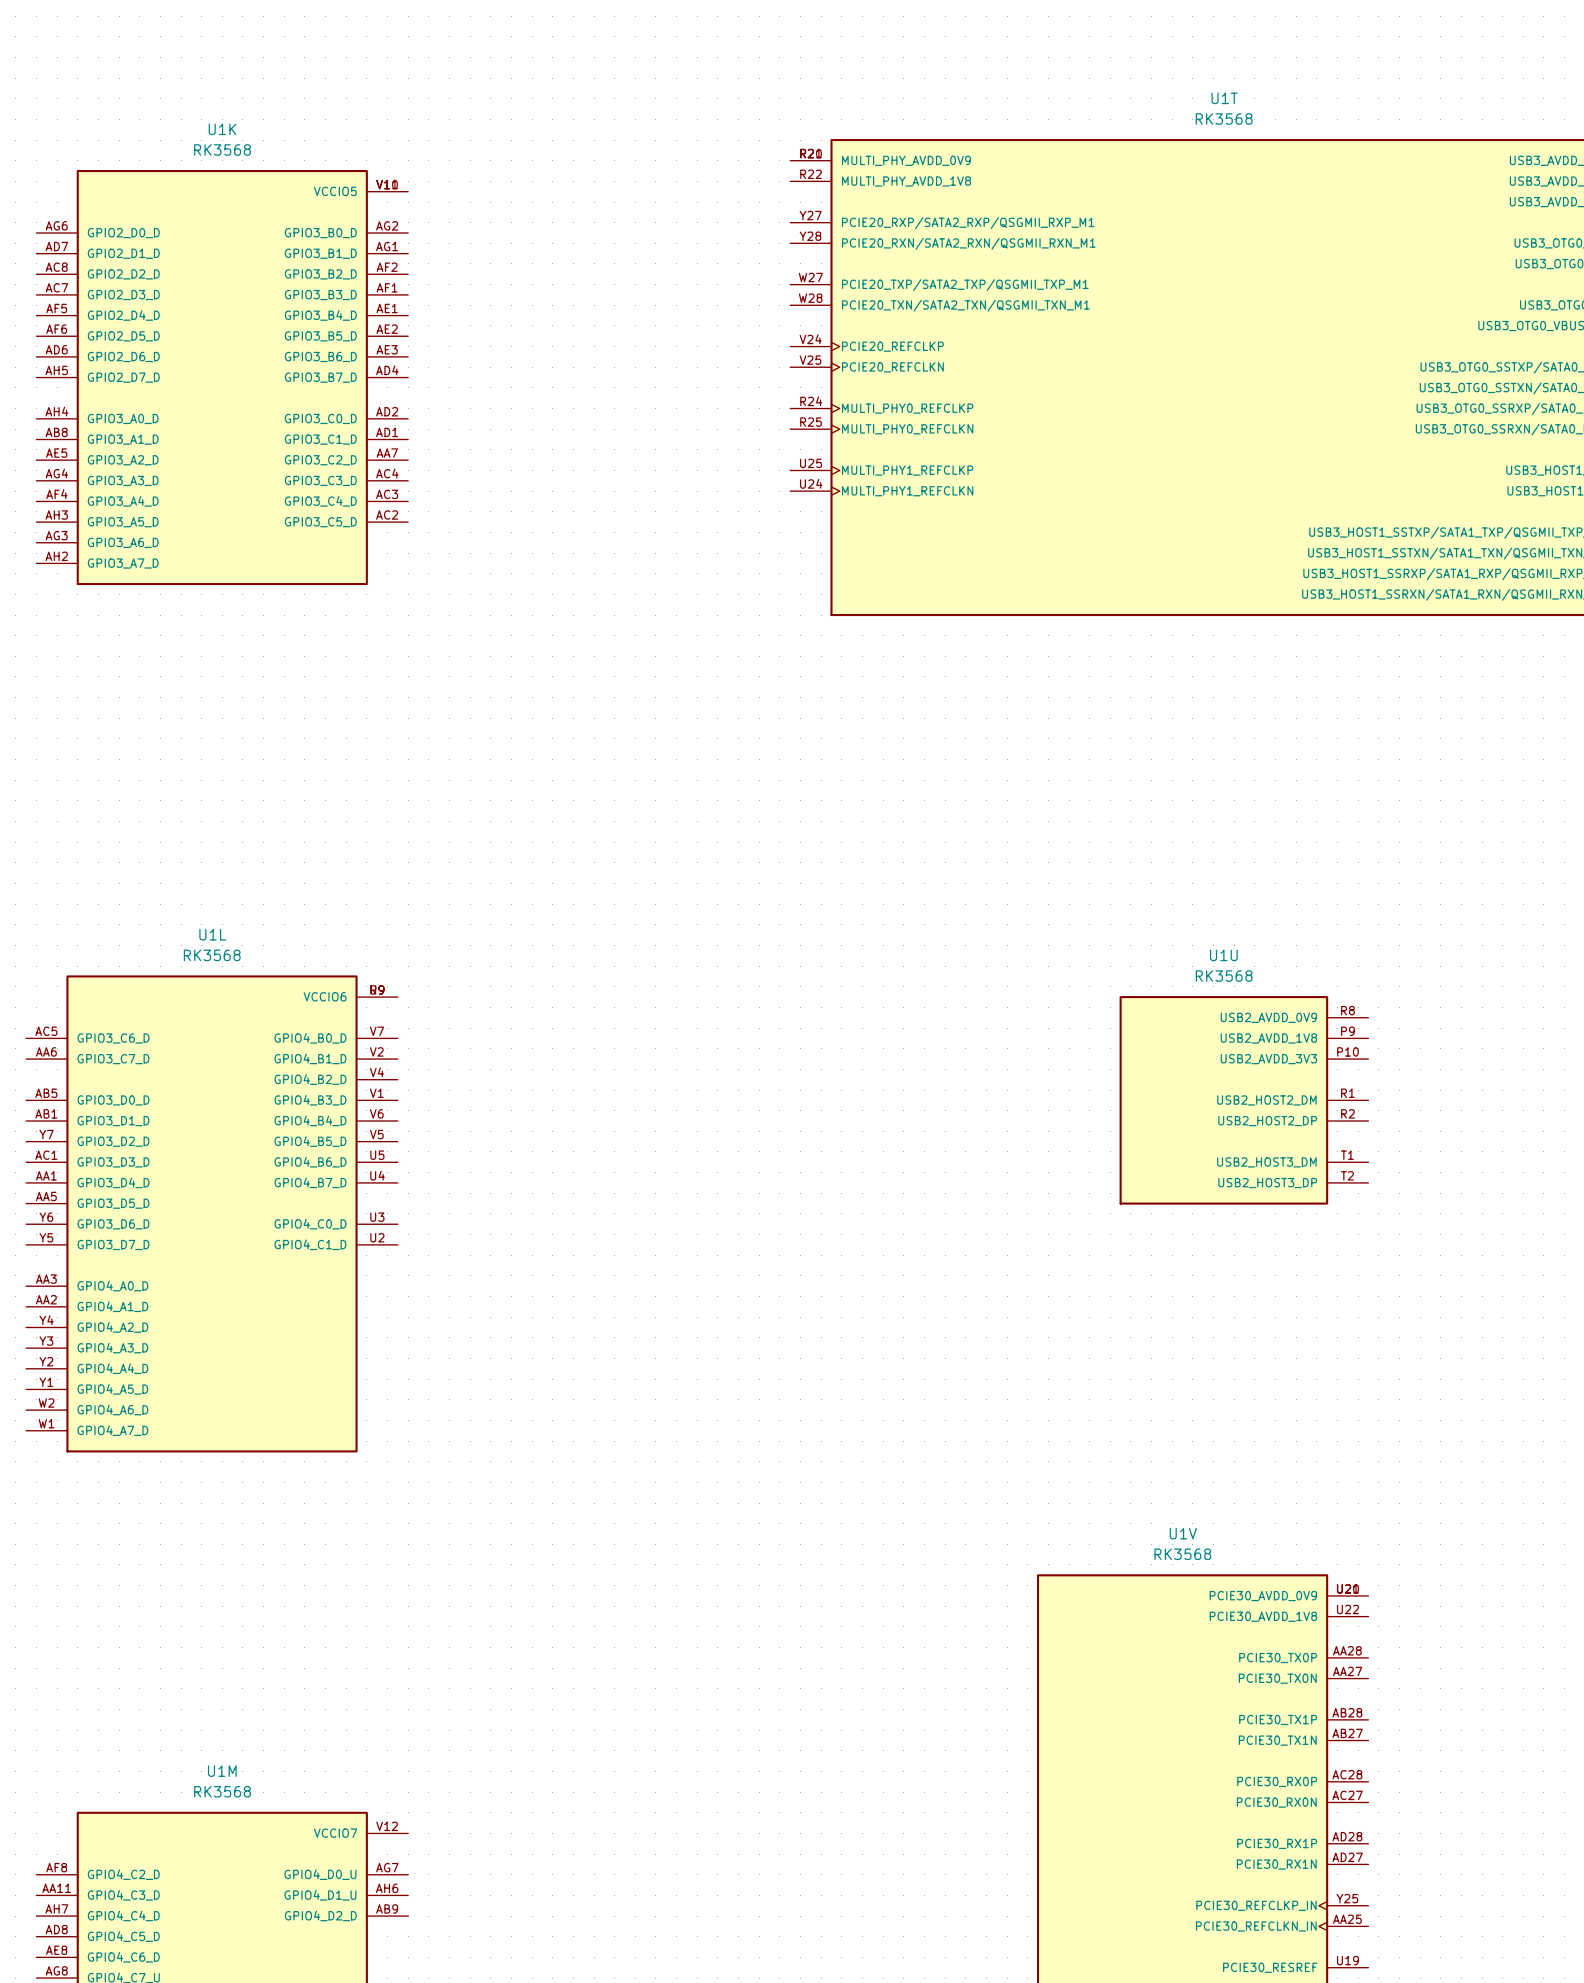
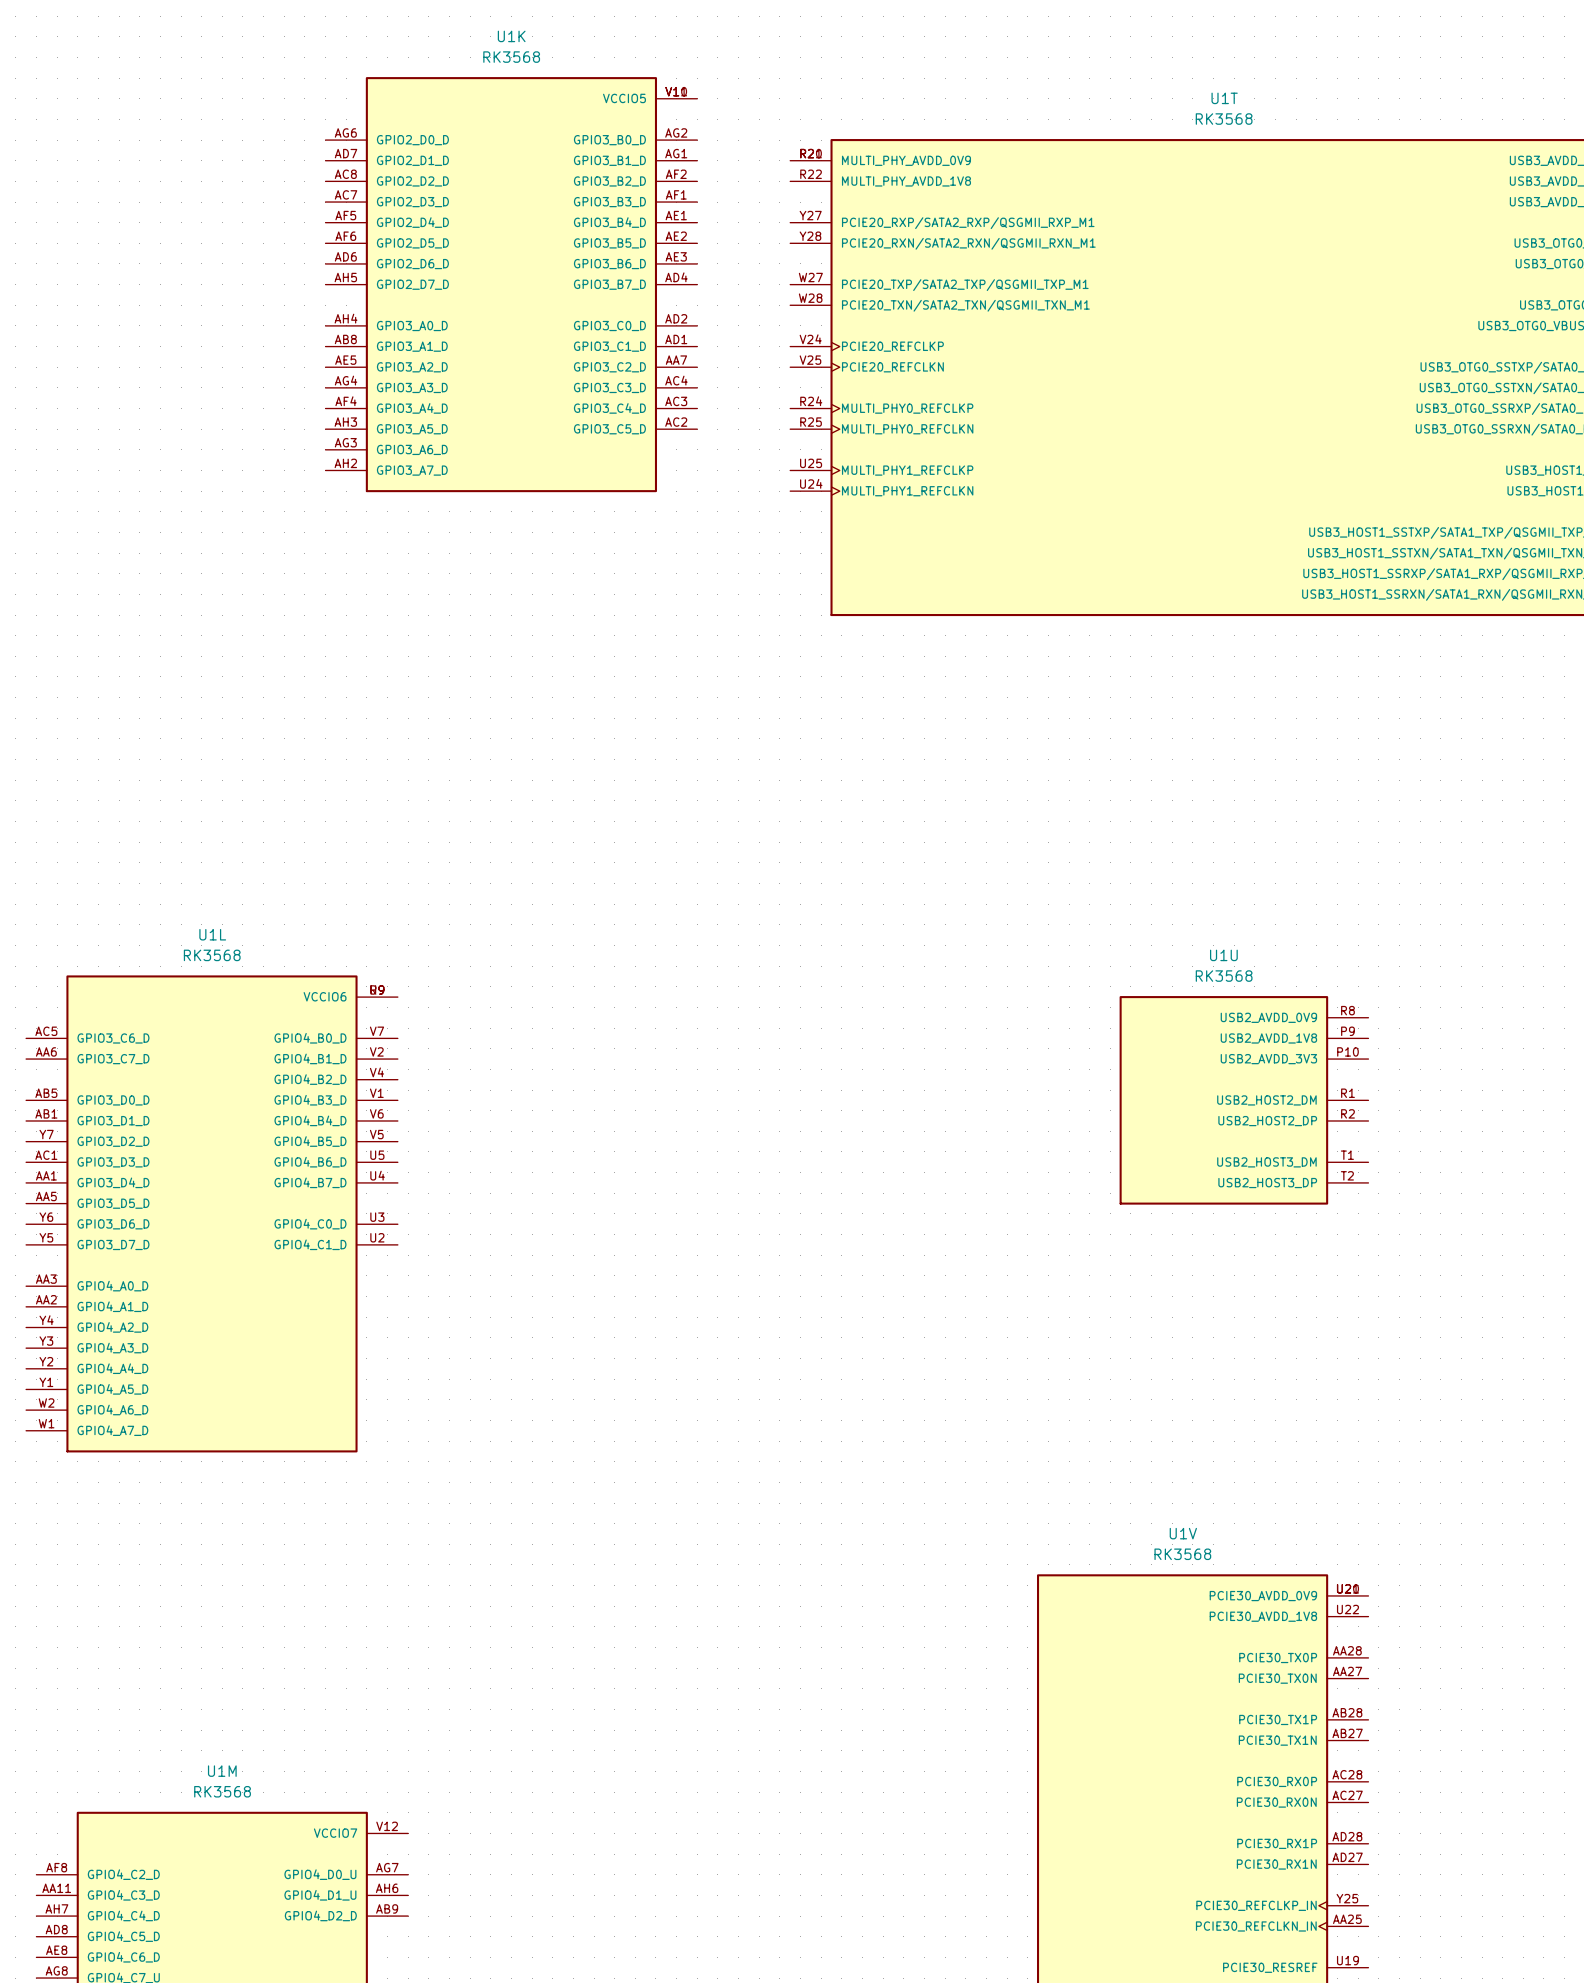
U1K position: (222, 377) -> (511, 284)

